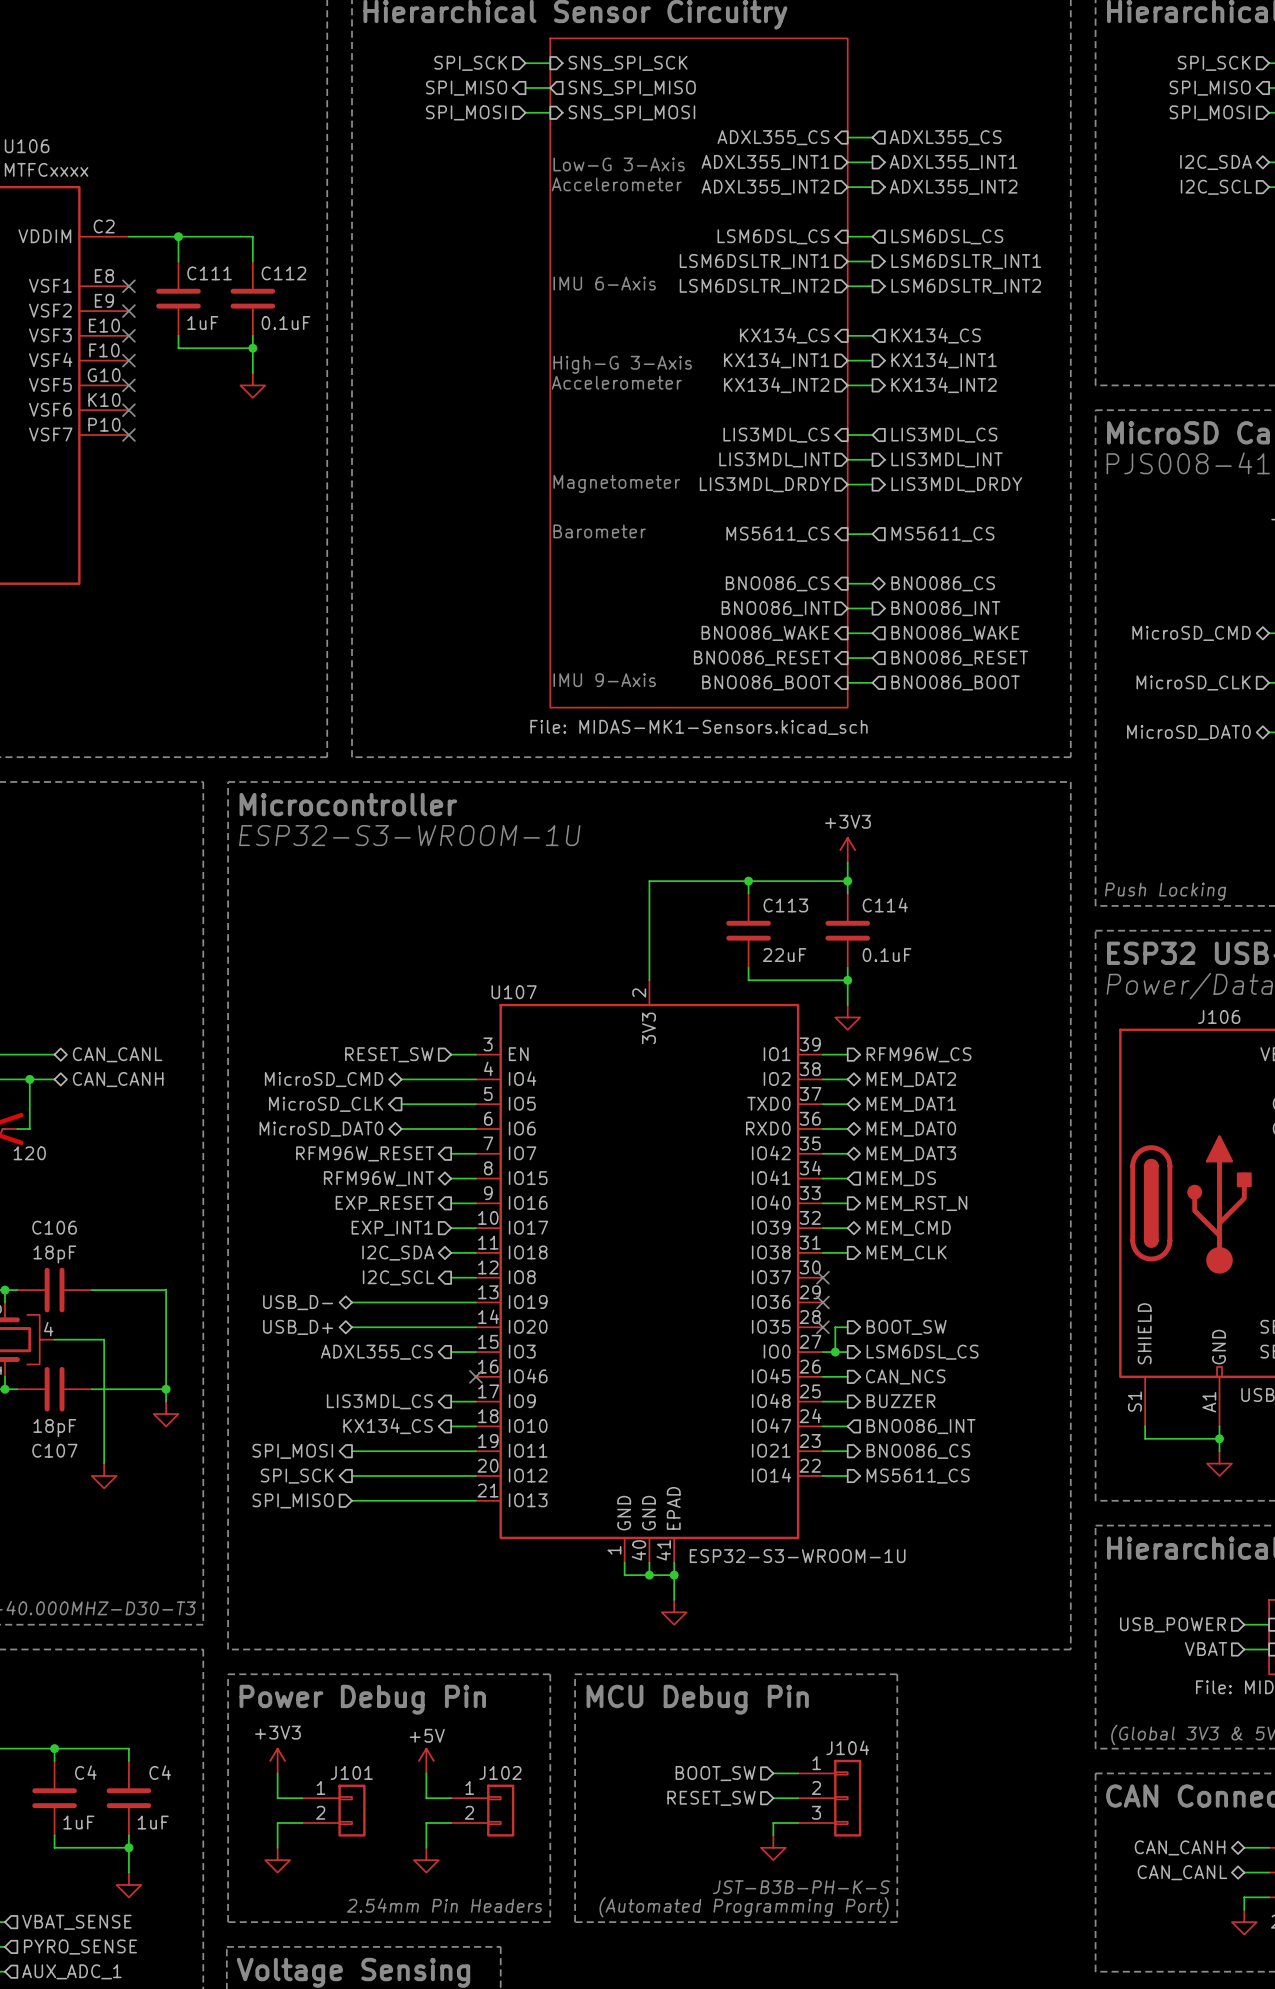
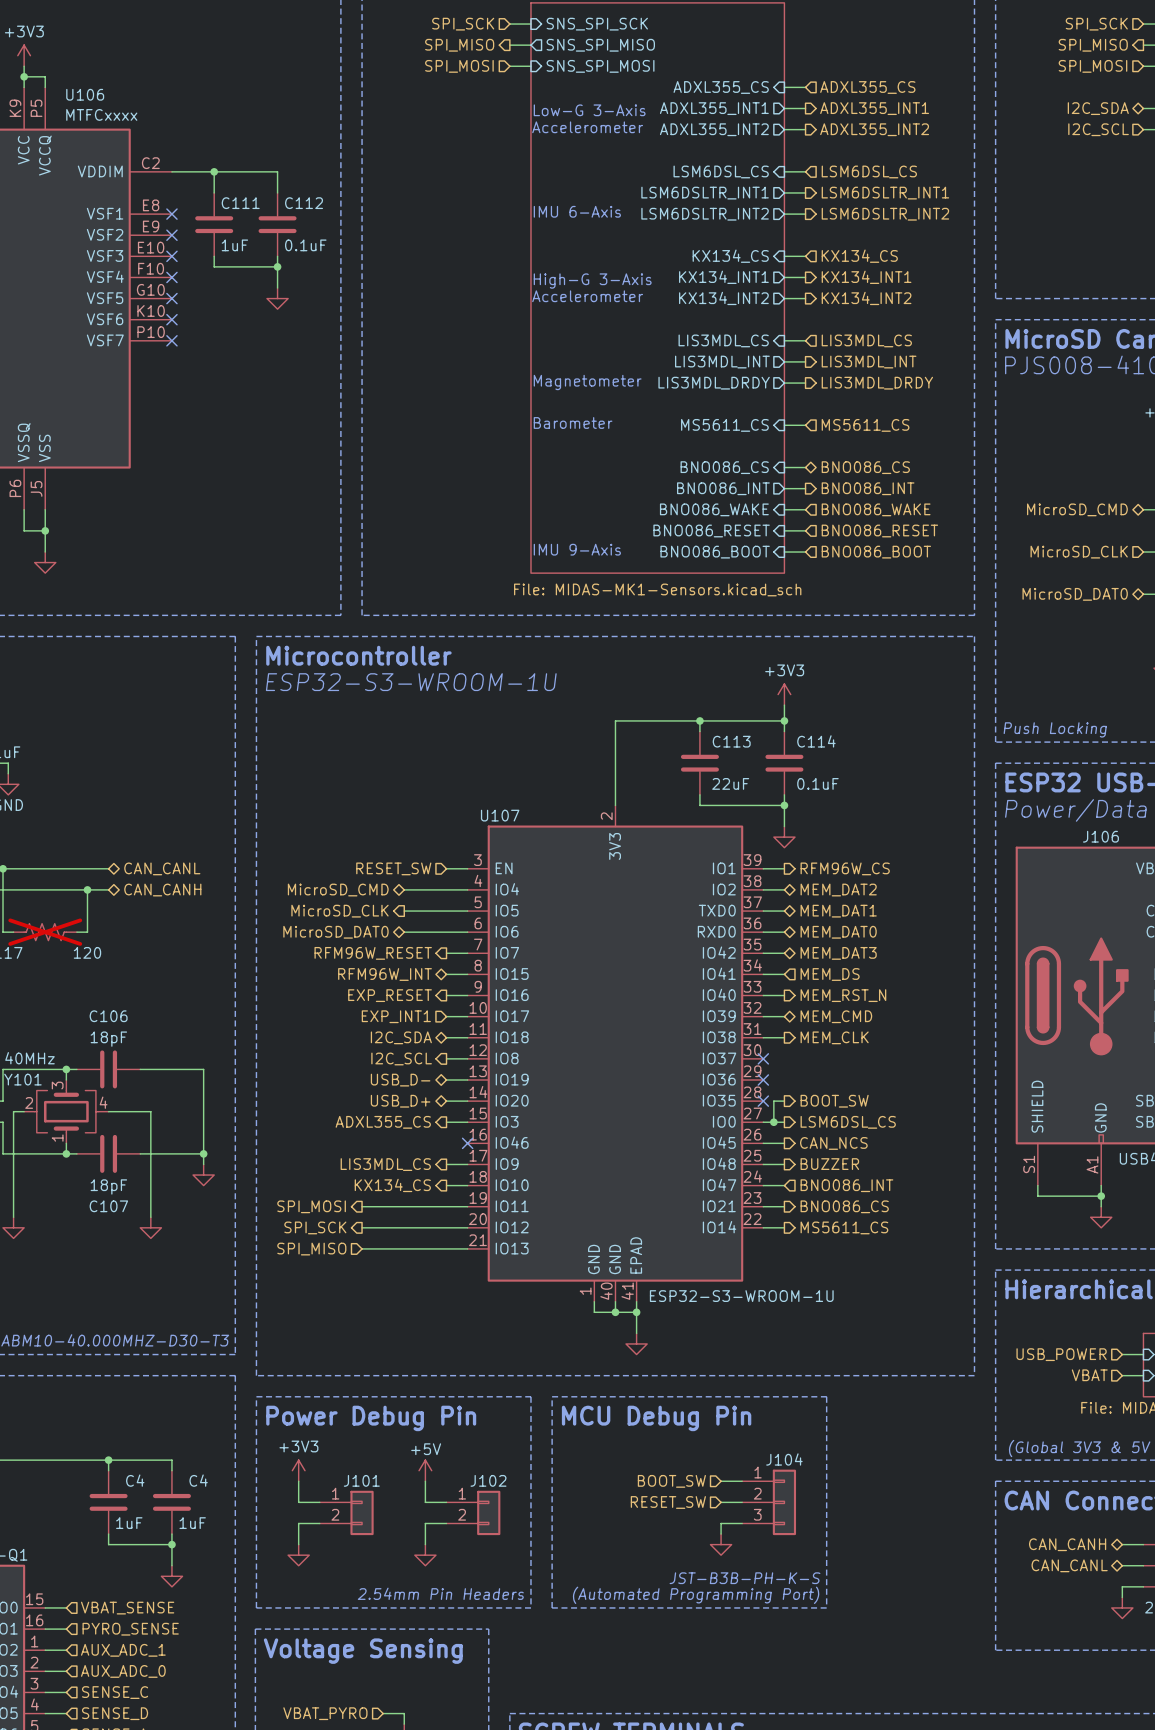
hierarchical label position: USB_D- (298, 1302) -> USB_D- (400, 1080)
wire: (352, 1302) (451, 1302) -> none
hierarchical label position: USB_D+ (298, 1327) -> USB_D+ (400, 1101)
wire: (352, 1327) (451, 1327) -> none

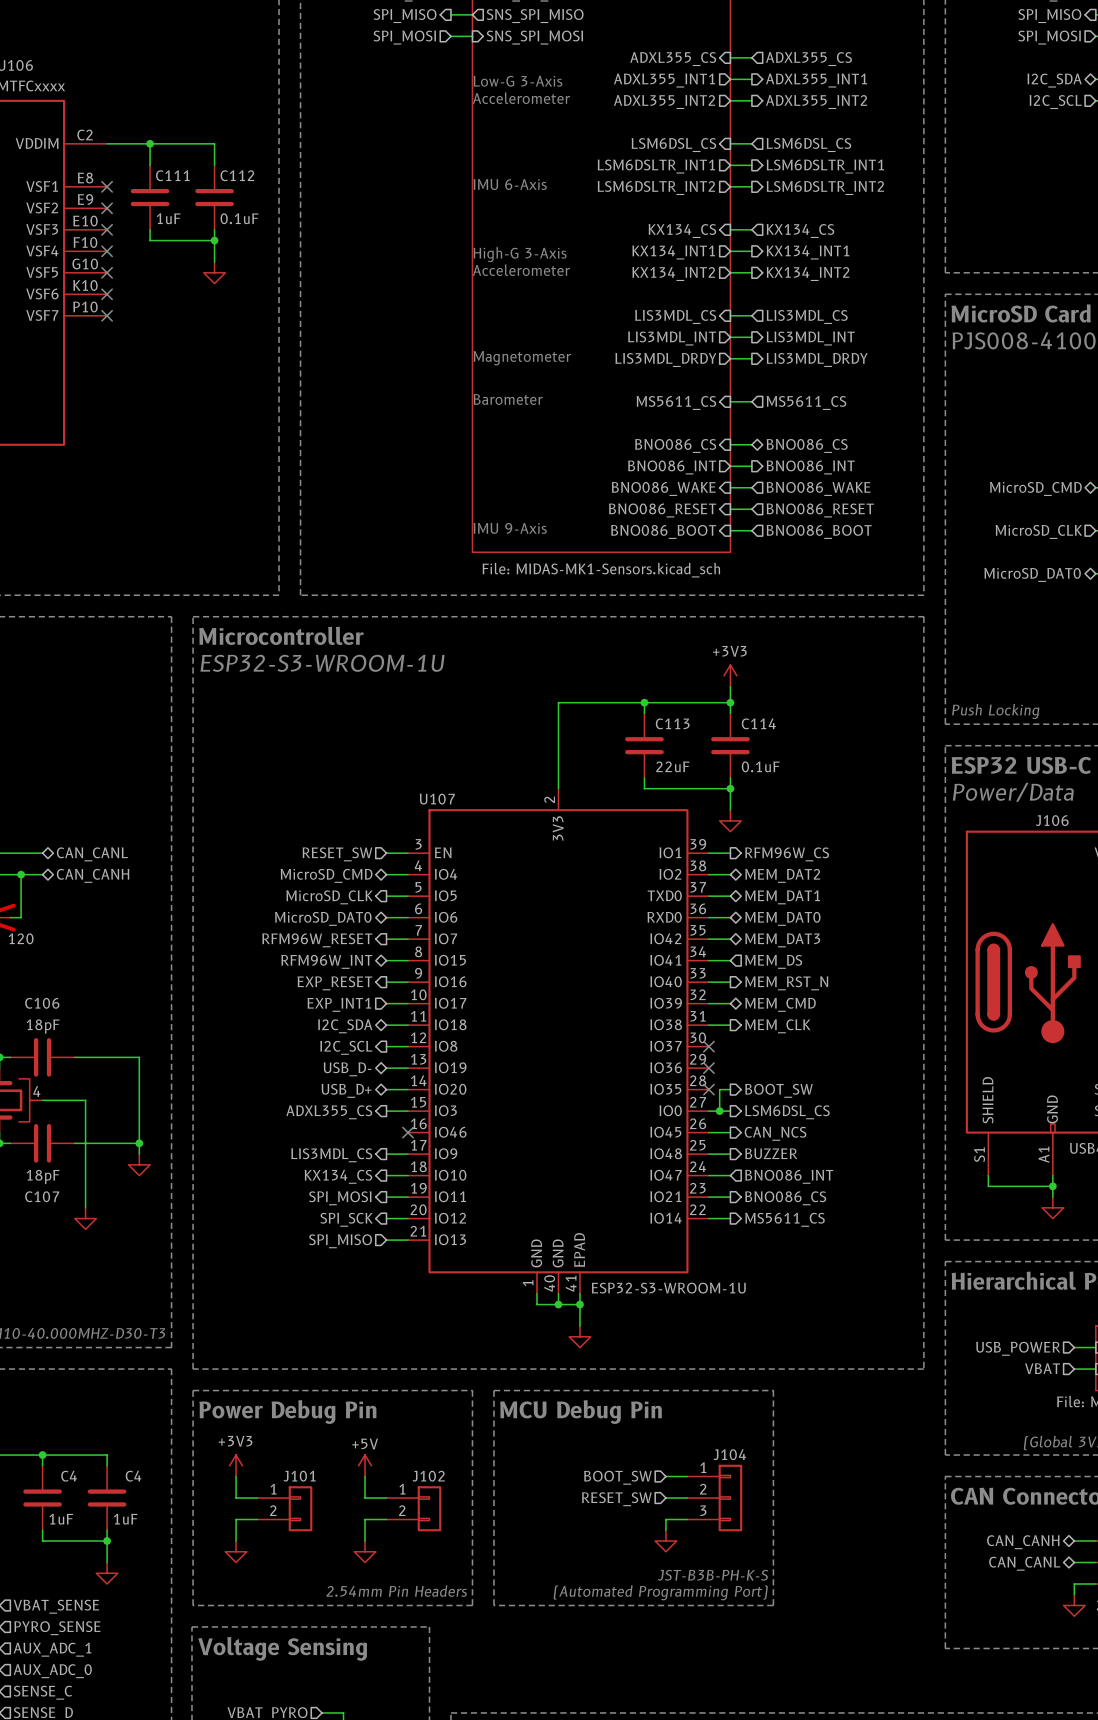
wire: (404, 889) (446, 889) -> none
hierarchical label position: MicroSD_CMD (338, 890) -> MicroSD_CMD (326, 875)
hierarchical label position: MicroSD_CLK (339, 911) -> MicroSD_CLK (329, 897)
wire: (404, 911) (446, 911) -> none
hierarchical label position: MicroSD_DAT0 (335, 932) -> MicroSD_DAT0 (323, 918)
wire: (404, 932) (446, 932) -> none
hierarchical label position: SPI_MOSI (311, 1206) -> SPI_MOSI (340, 1198)
wire: (362, 1206) (446, 1206) -> none
hierarchical label position: SPI_SCK (315, 1227) -> SPI_SCK (346, 1219)
wire: (362, 1227) (446, 1227) -> none
wire: (362, 1248) (446, 1248) -> none
hierarchical label position: SPI_MISO (311, 1249) -> SPI_MISO (340, 1241)

